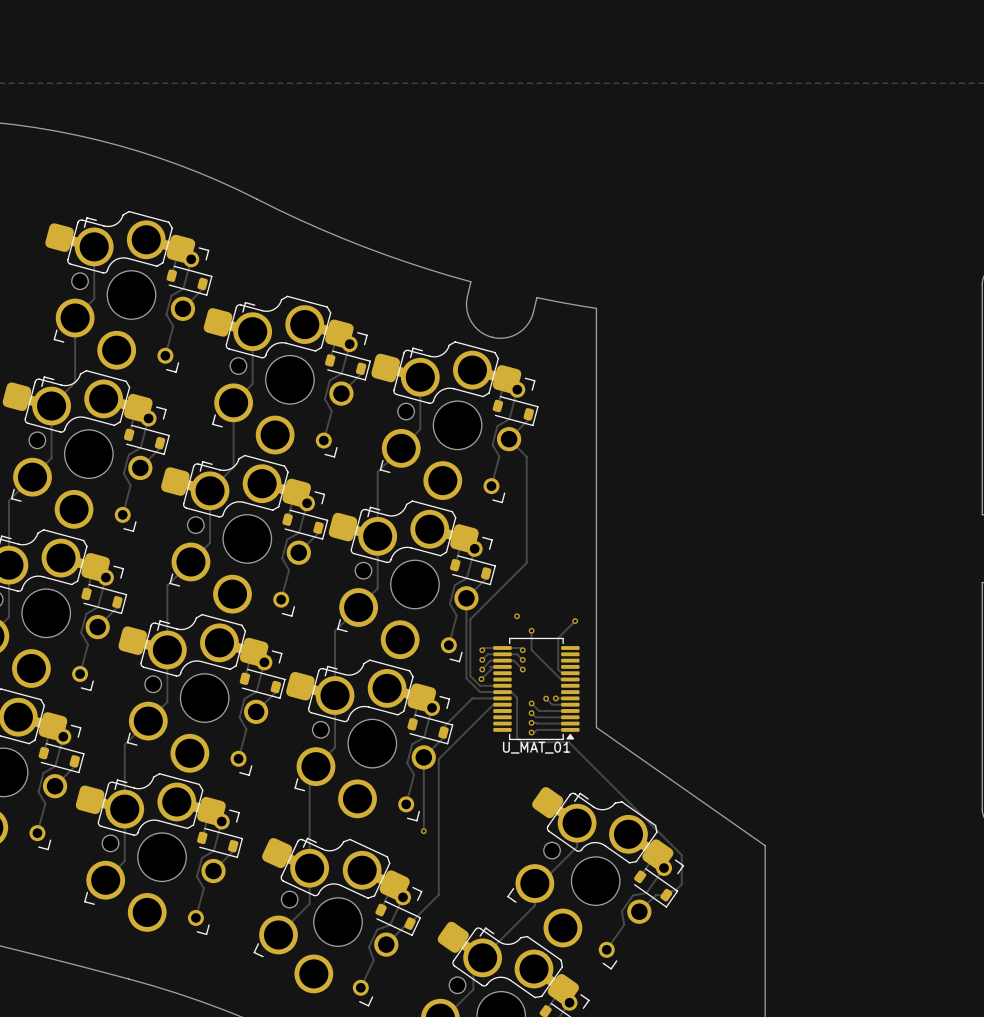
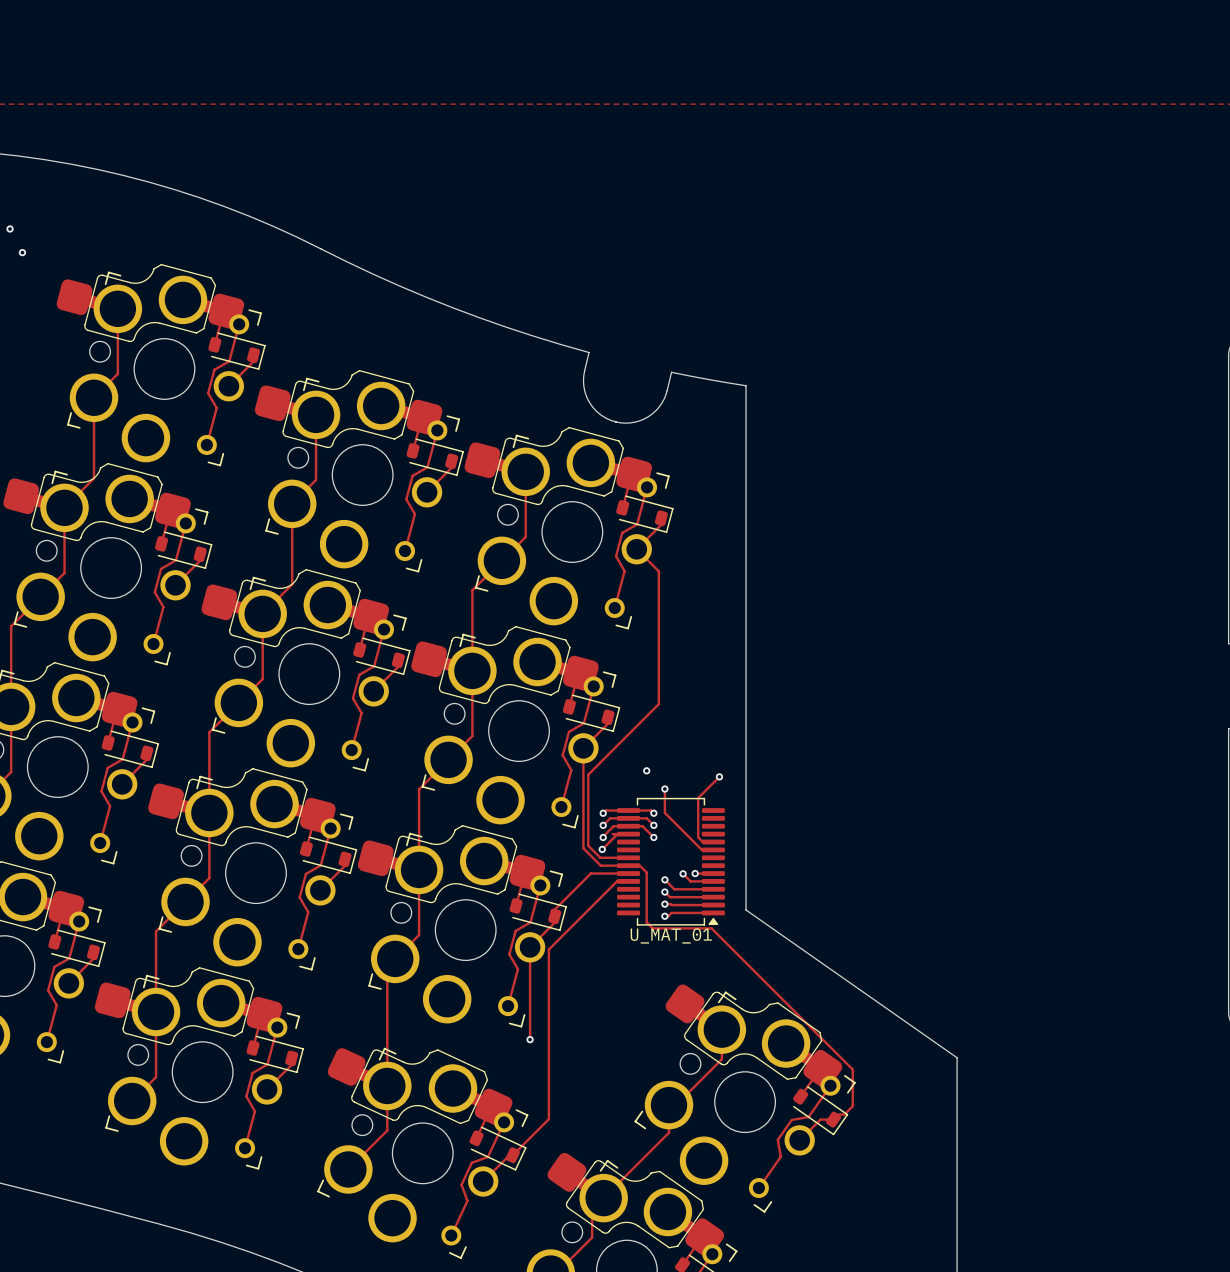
via: none -> (10, 228)
via: none -> (22, 252)

